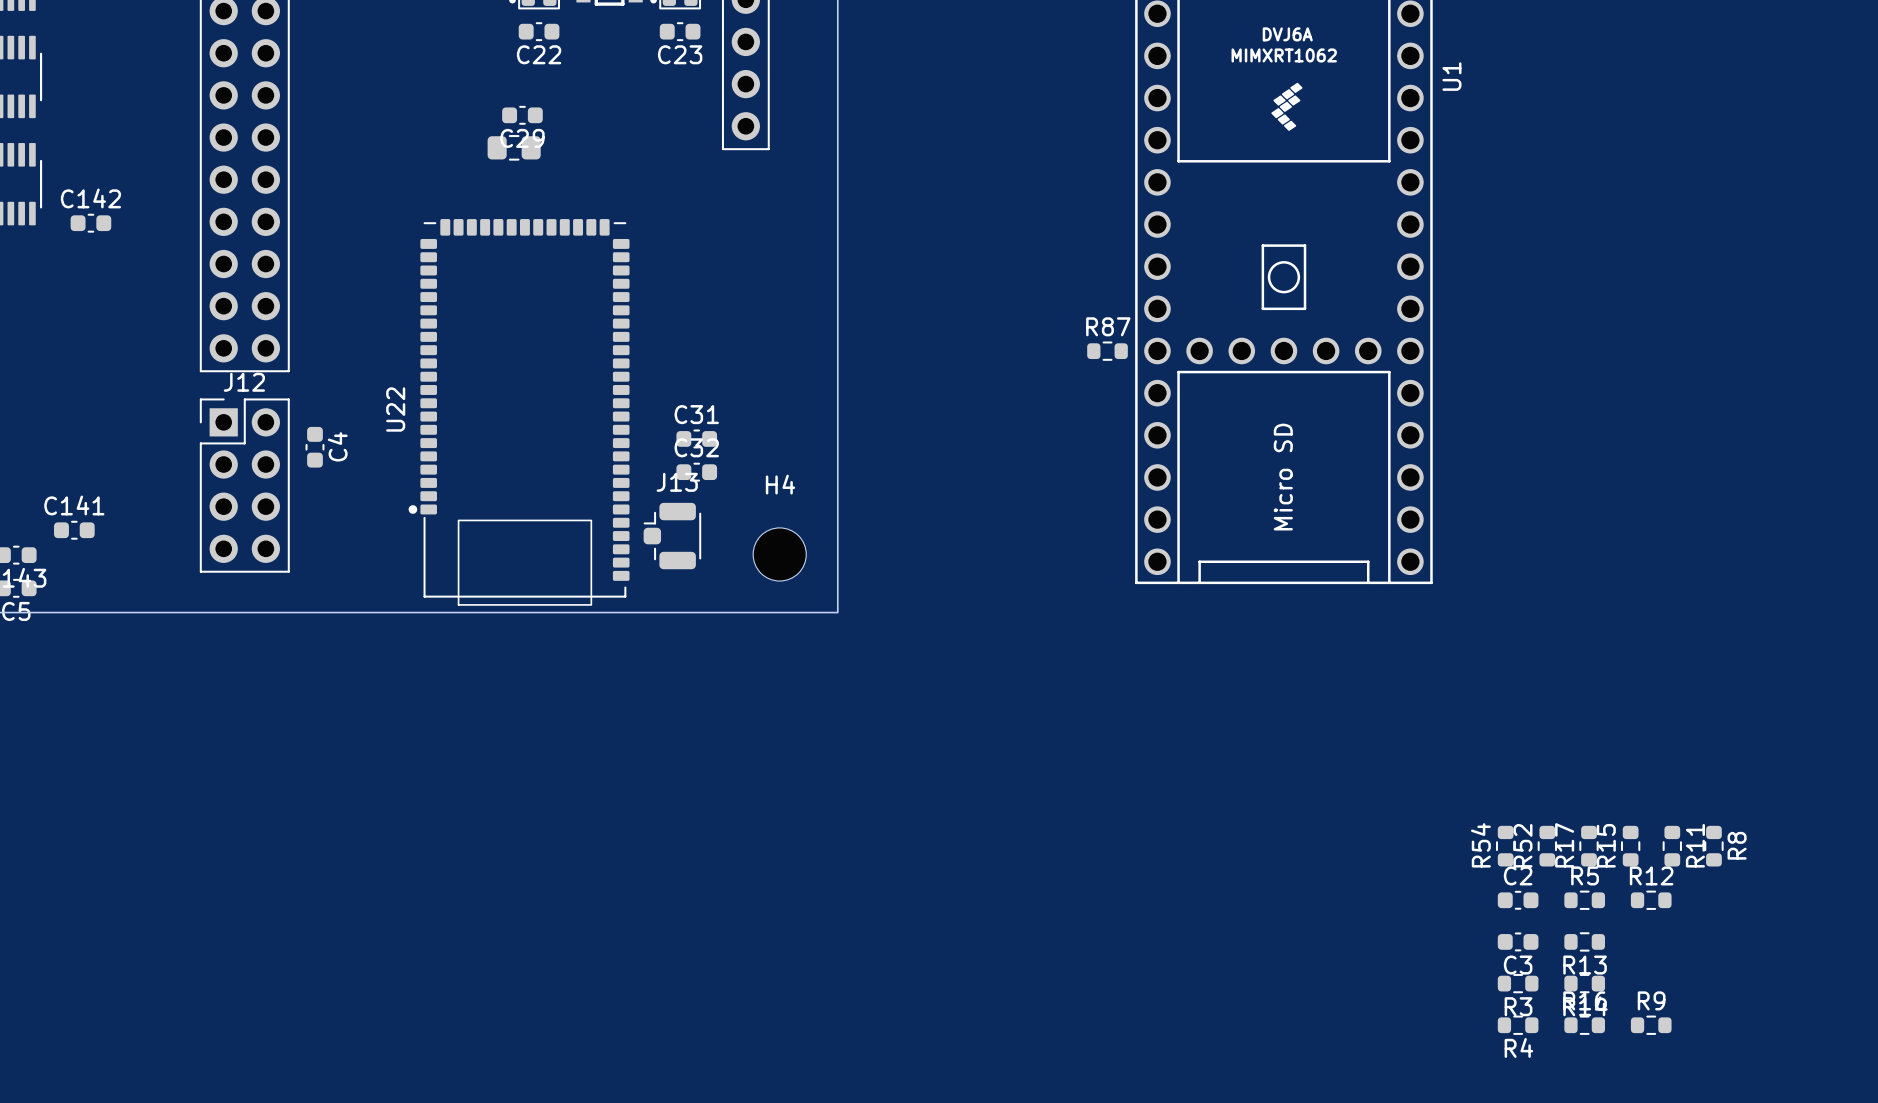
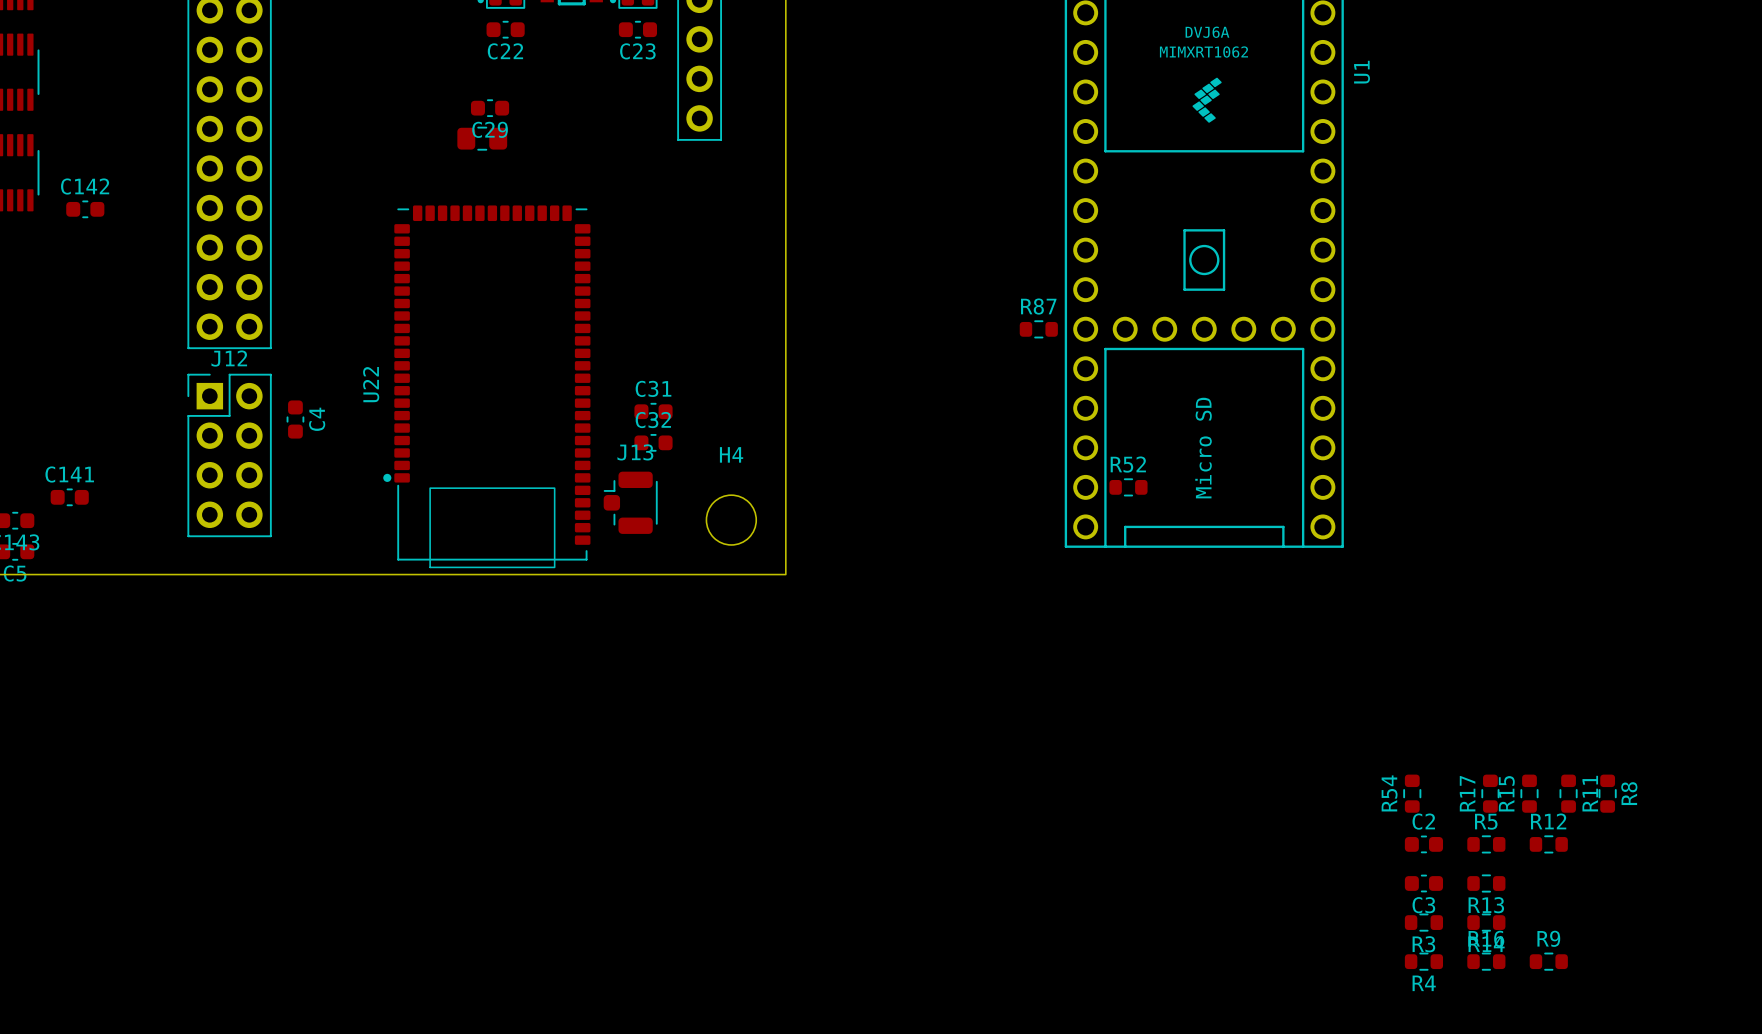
R52 rotation: 0° (1547, 846) -> 90° clockwise (1128, 487)
R52 position: (1547, 846) -> (1128, 487)

